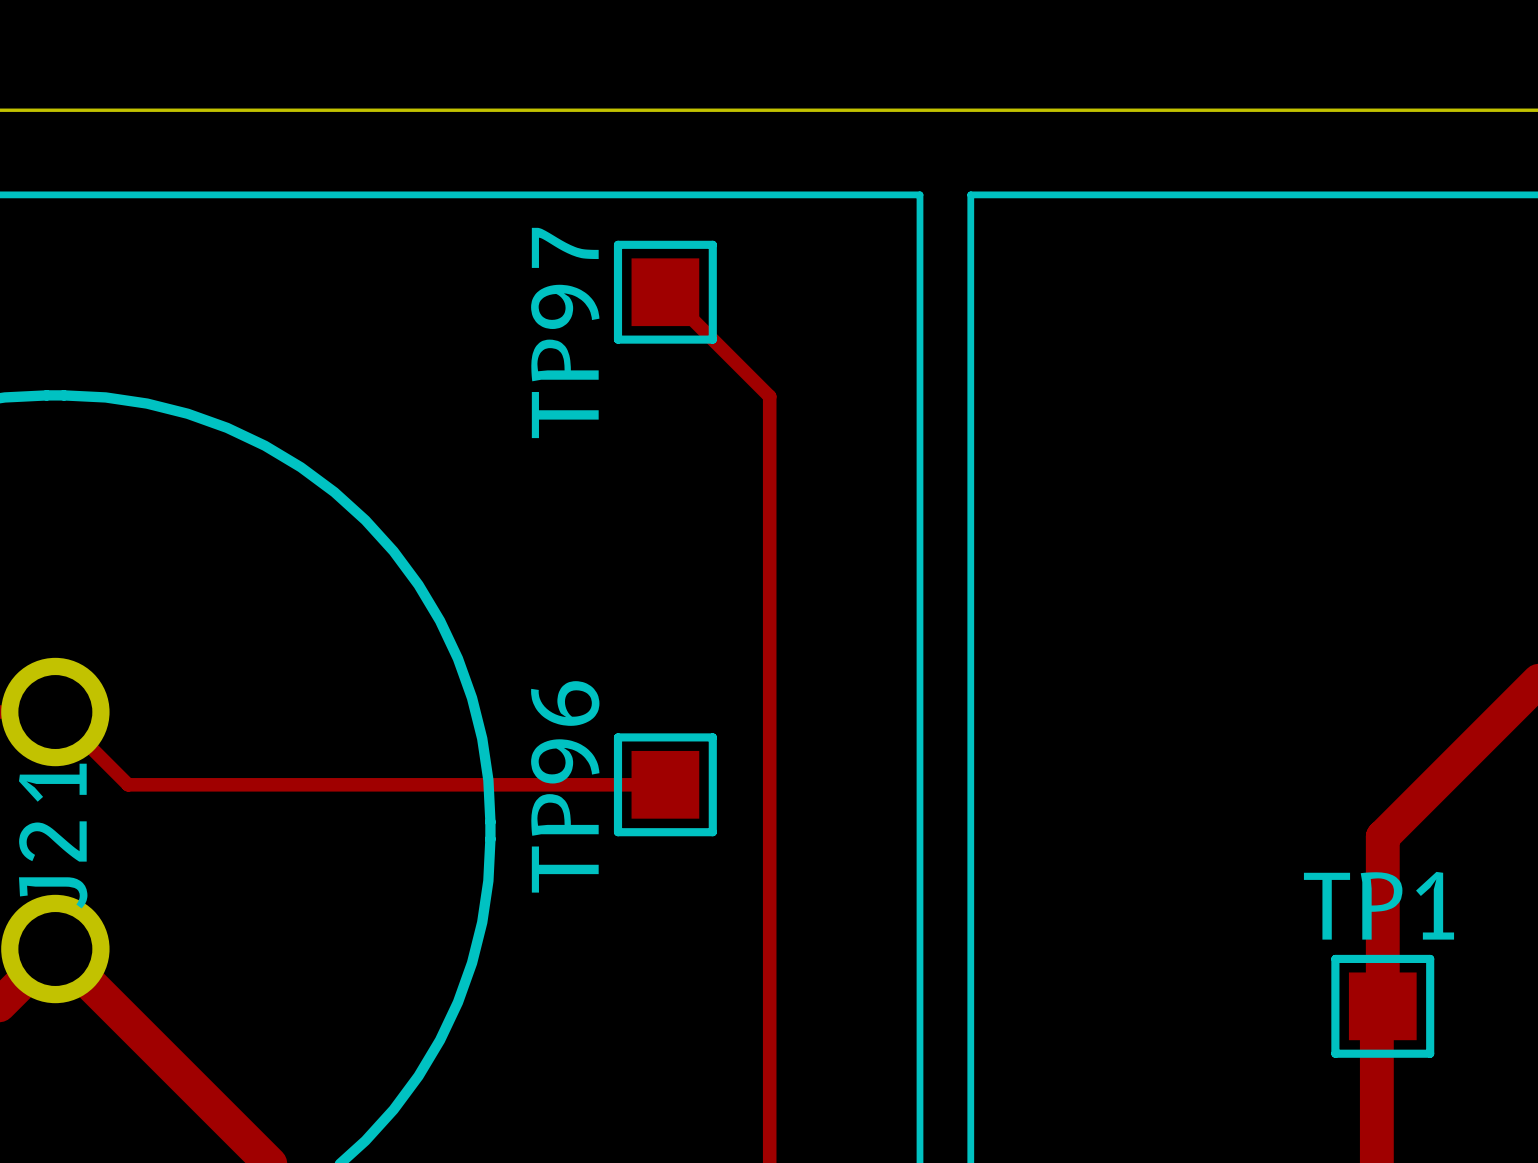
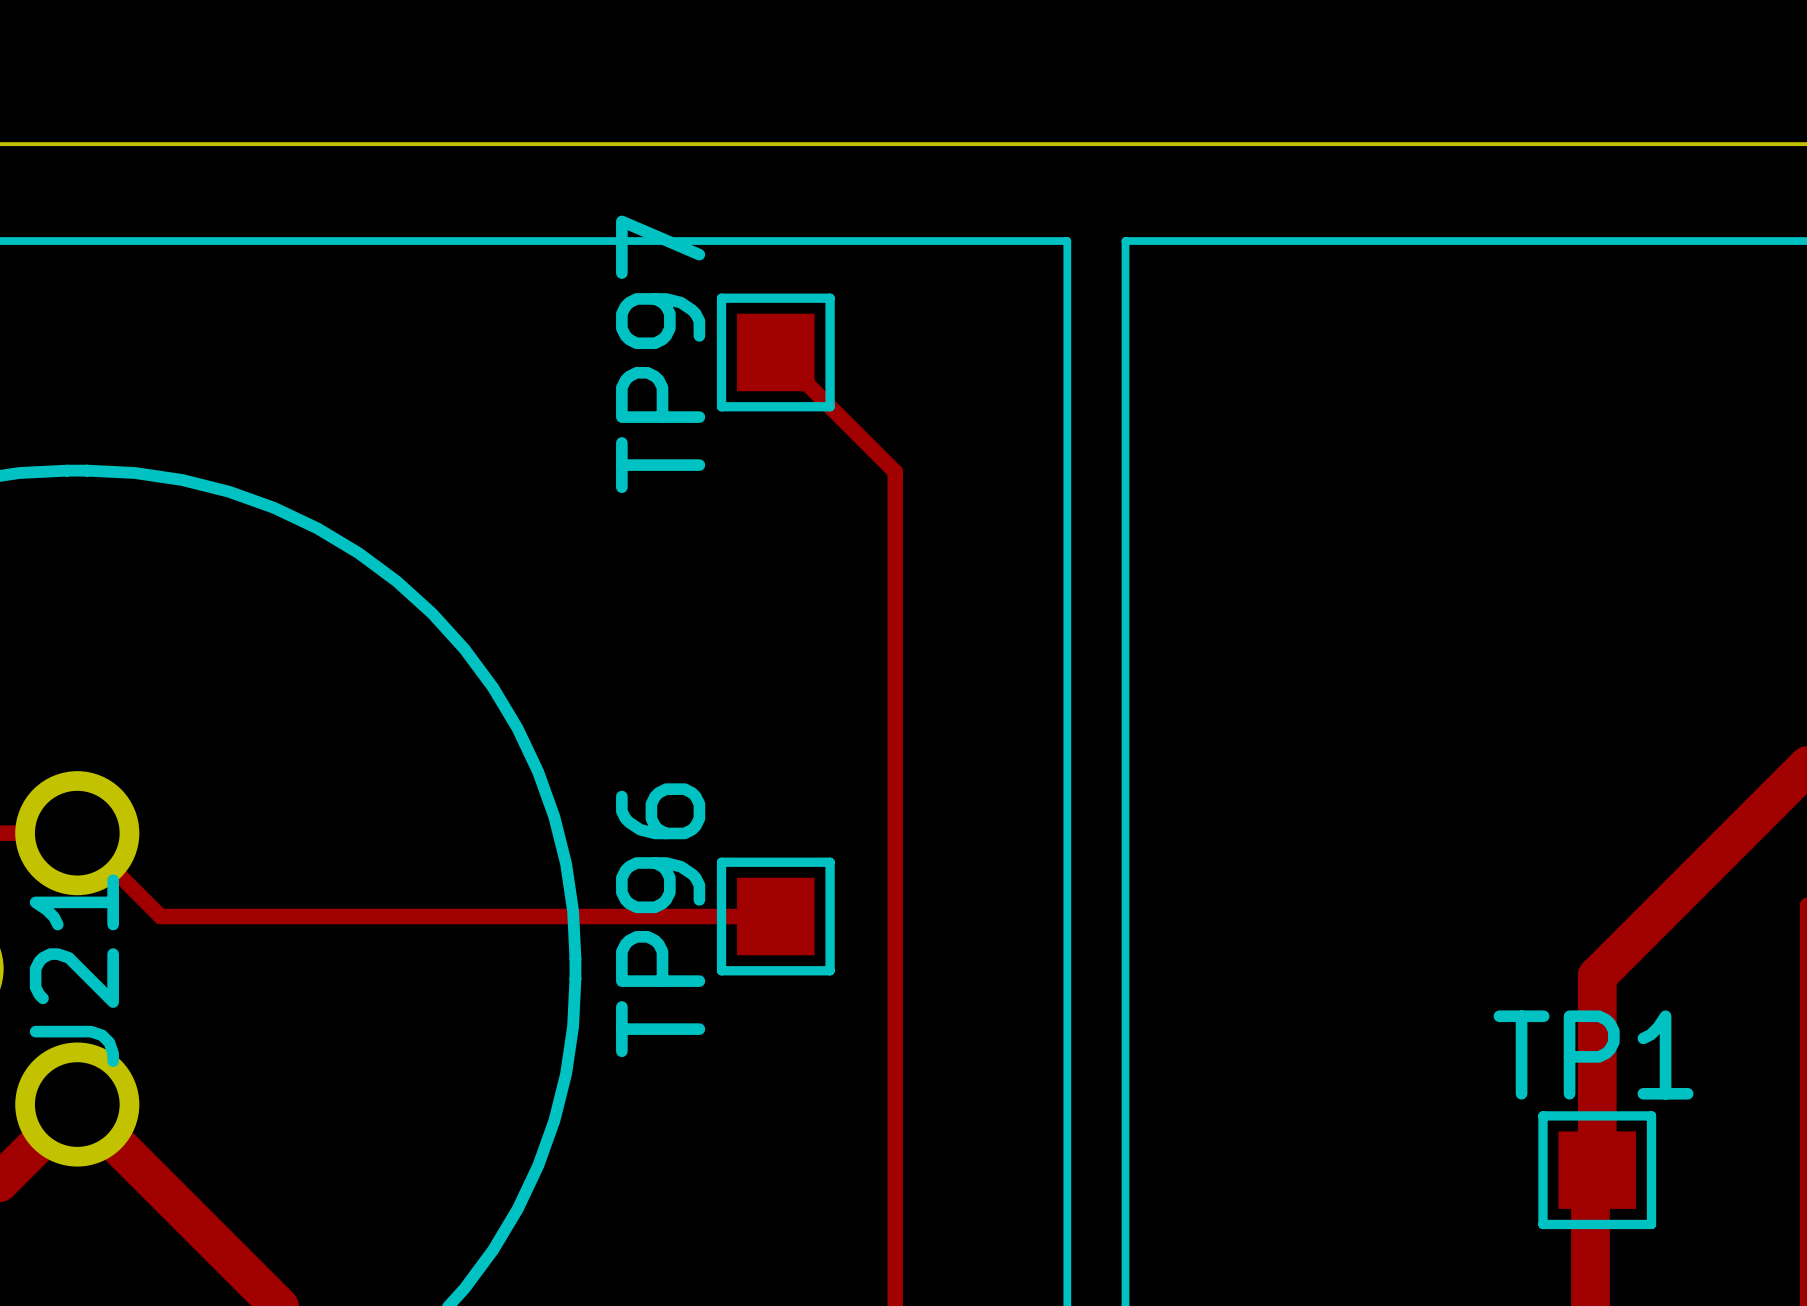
TP97 name position: TP97 (565, 332) -> TP97 (660, 354)

